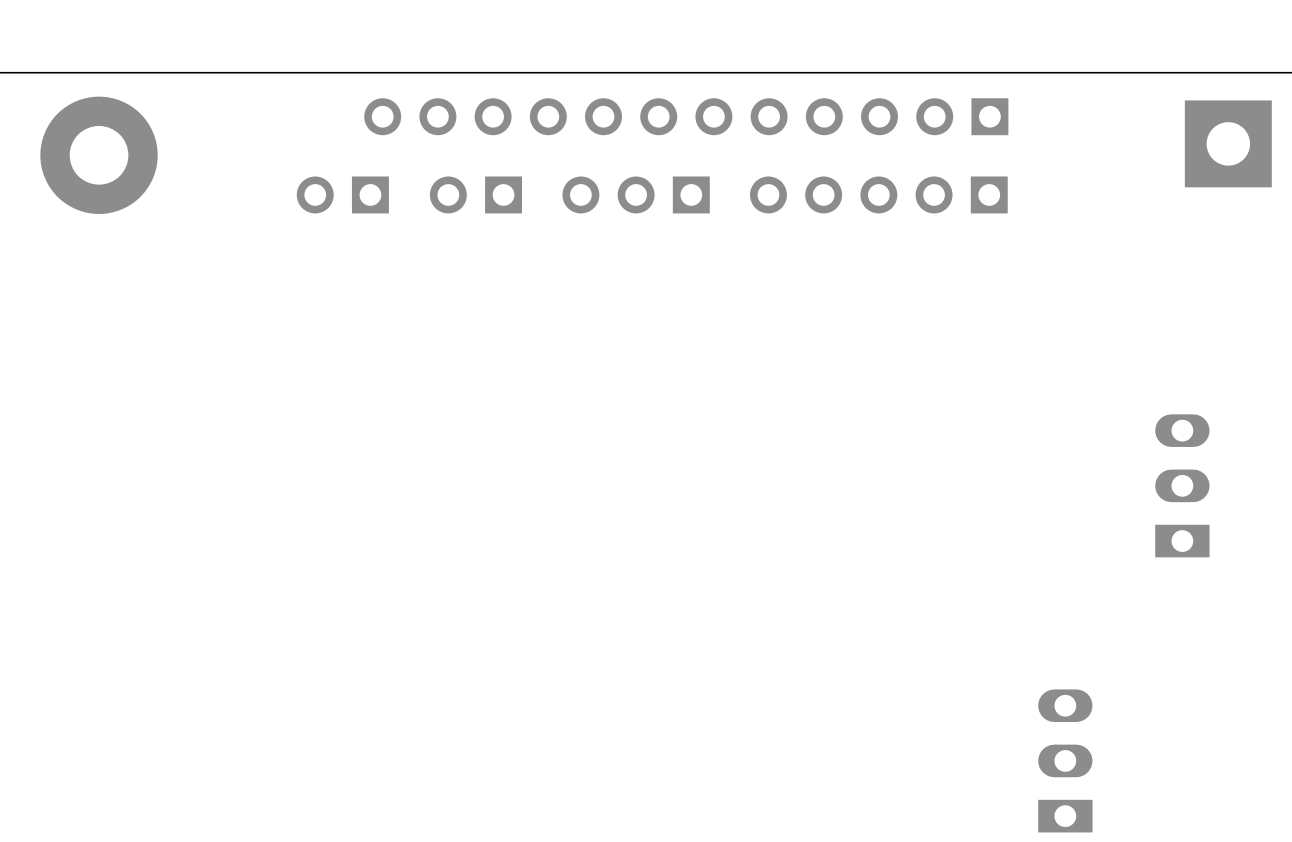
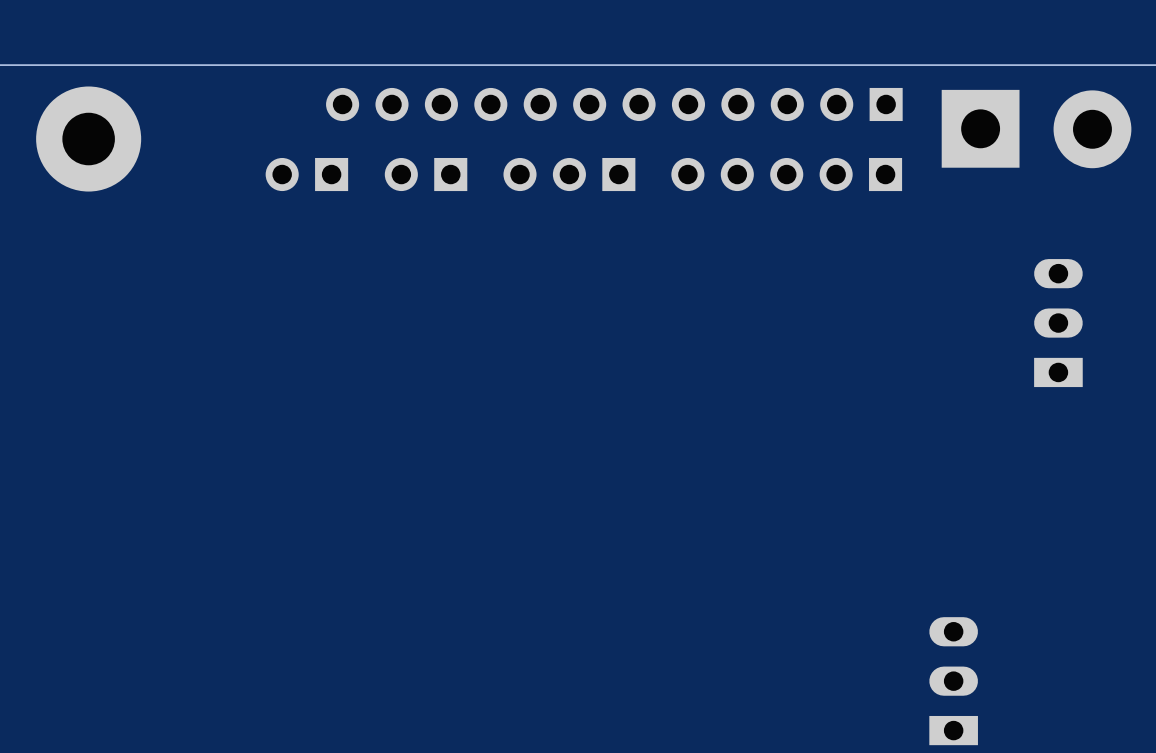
part footprint: [1184, 100, 1272, 188] -> [1053, 90, 1132, 169]
part: none -> (980, 128)
part position: (1182, 485) -> (1058, 323)

